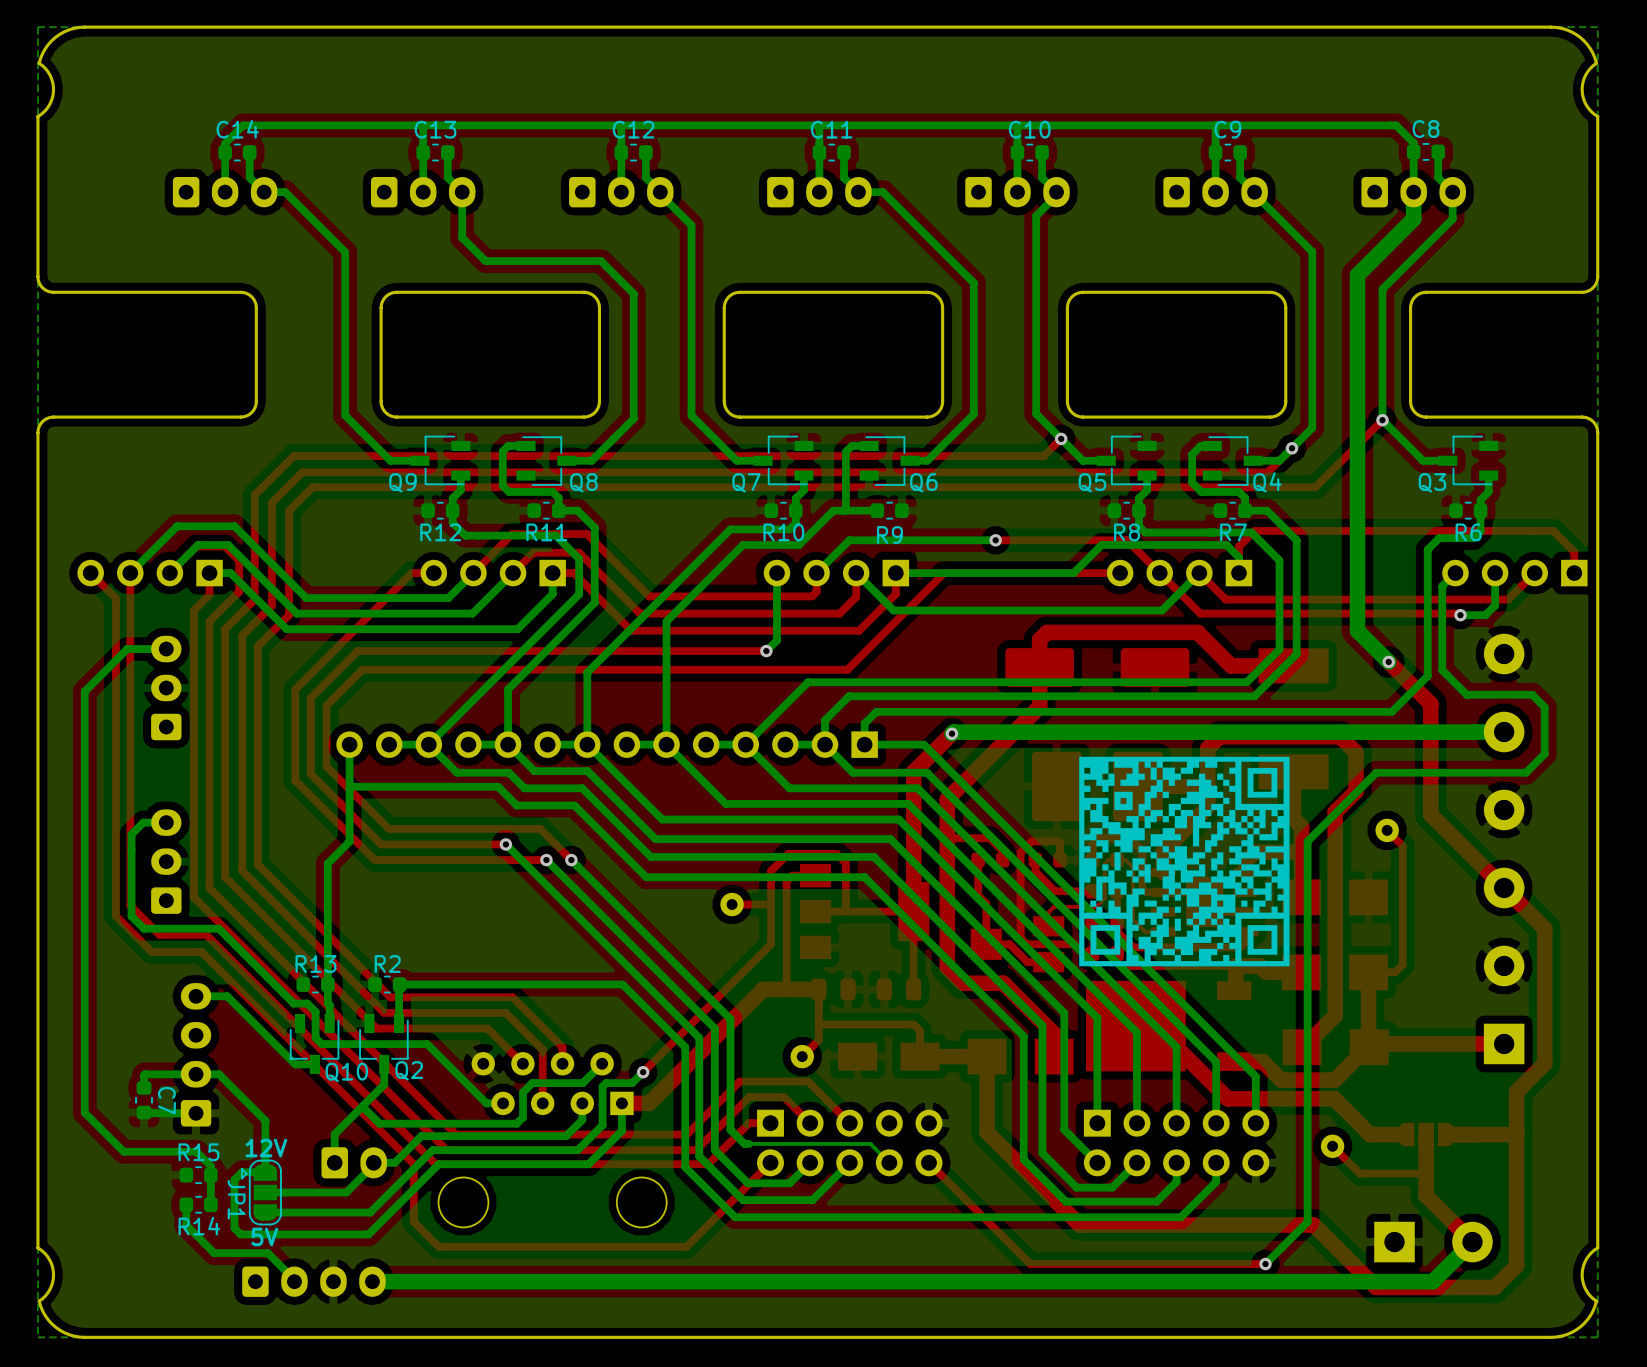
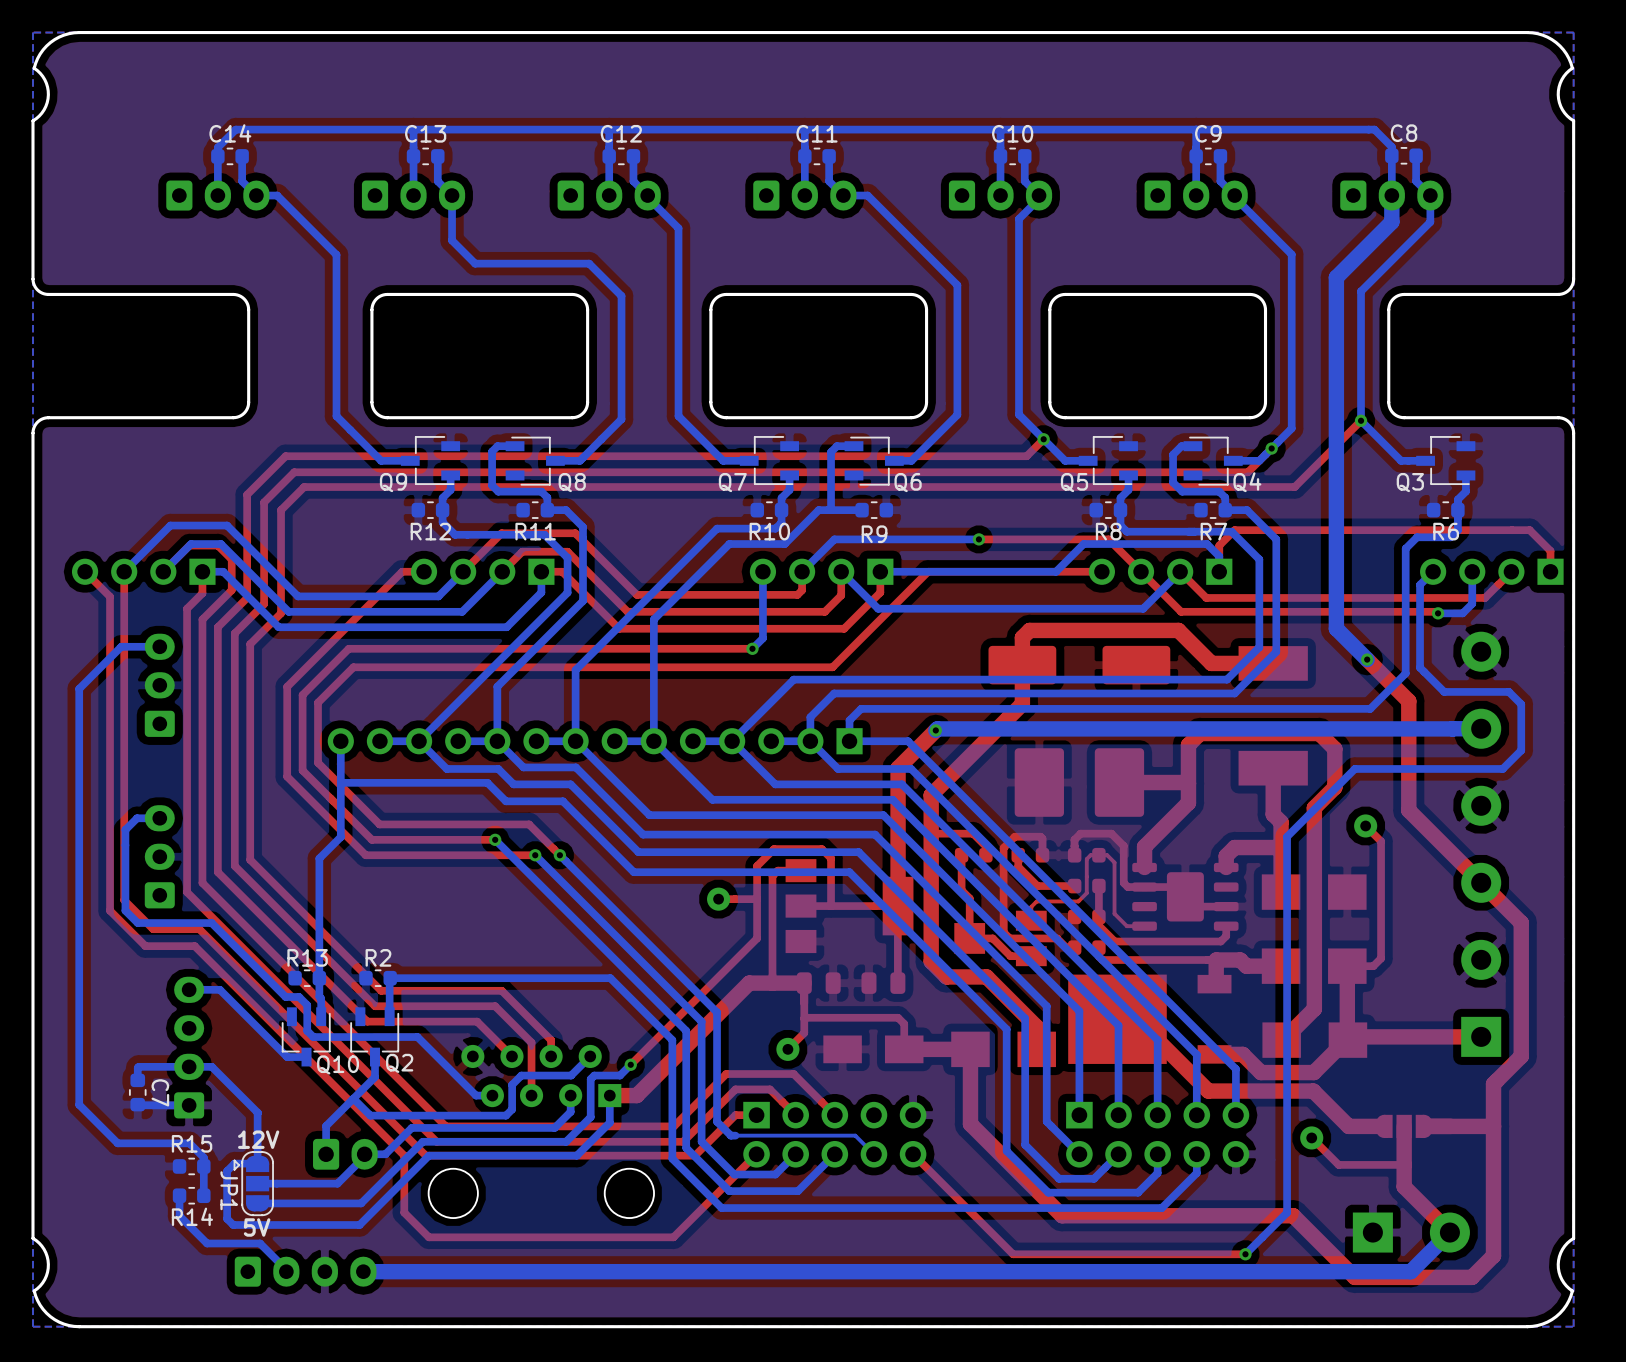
drawing: [1079, 756, 1290, 967] -> none

